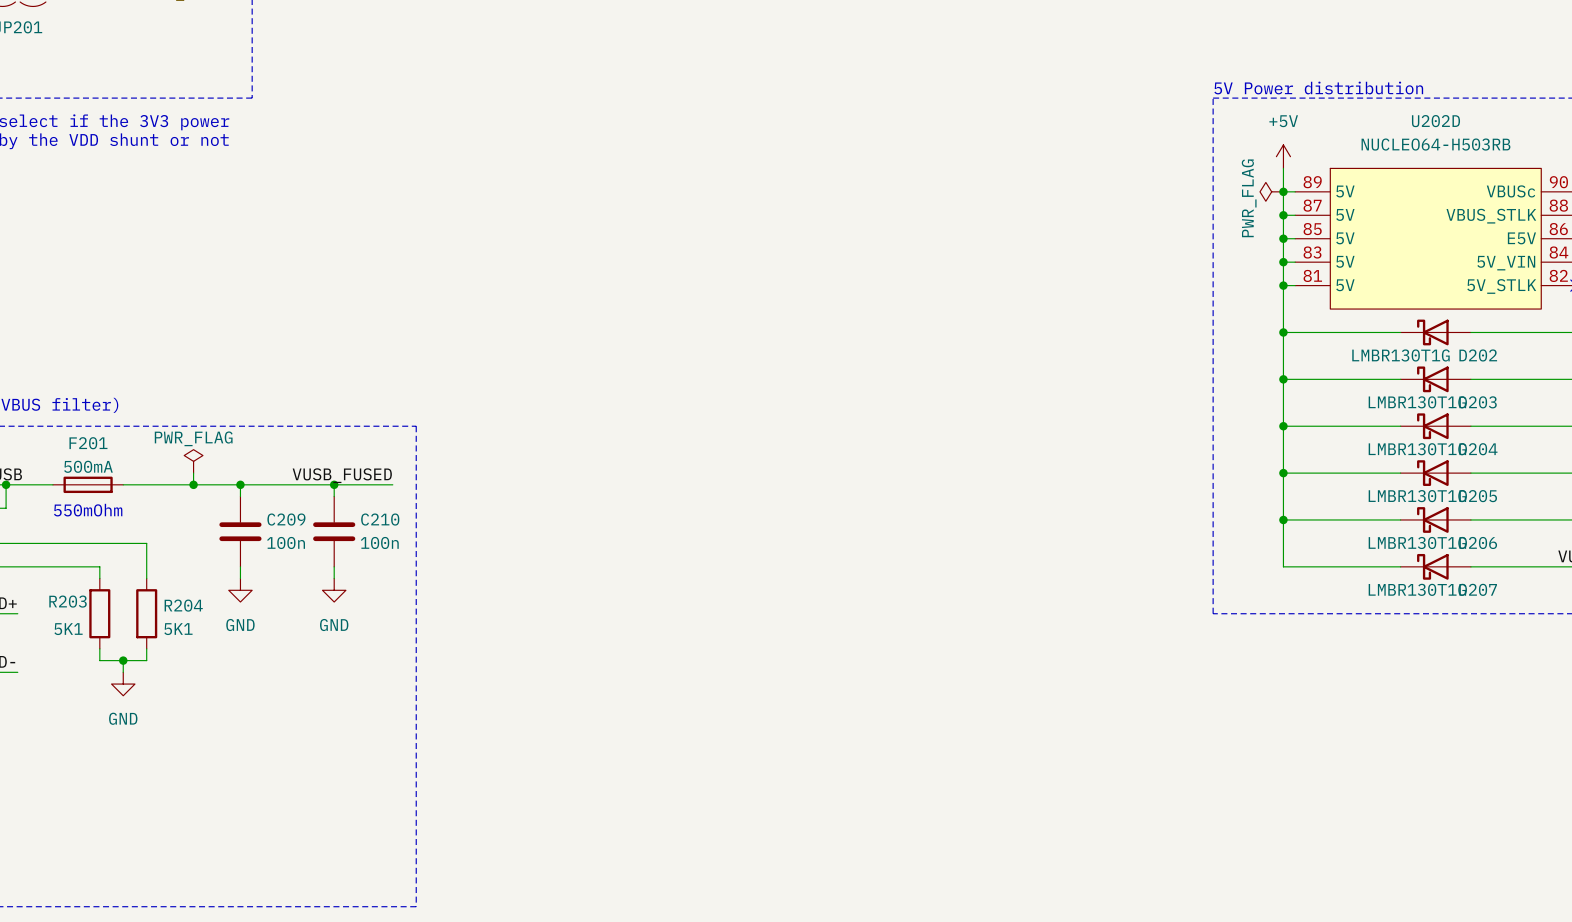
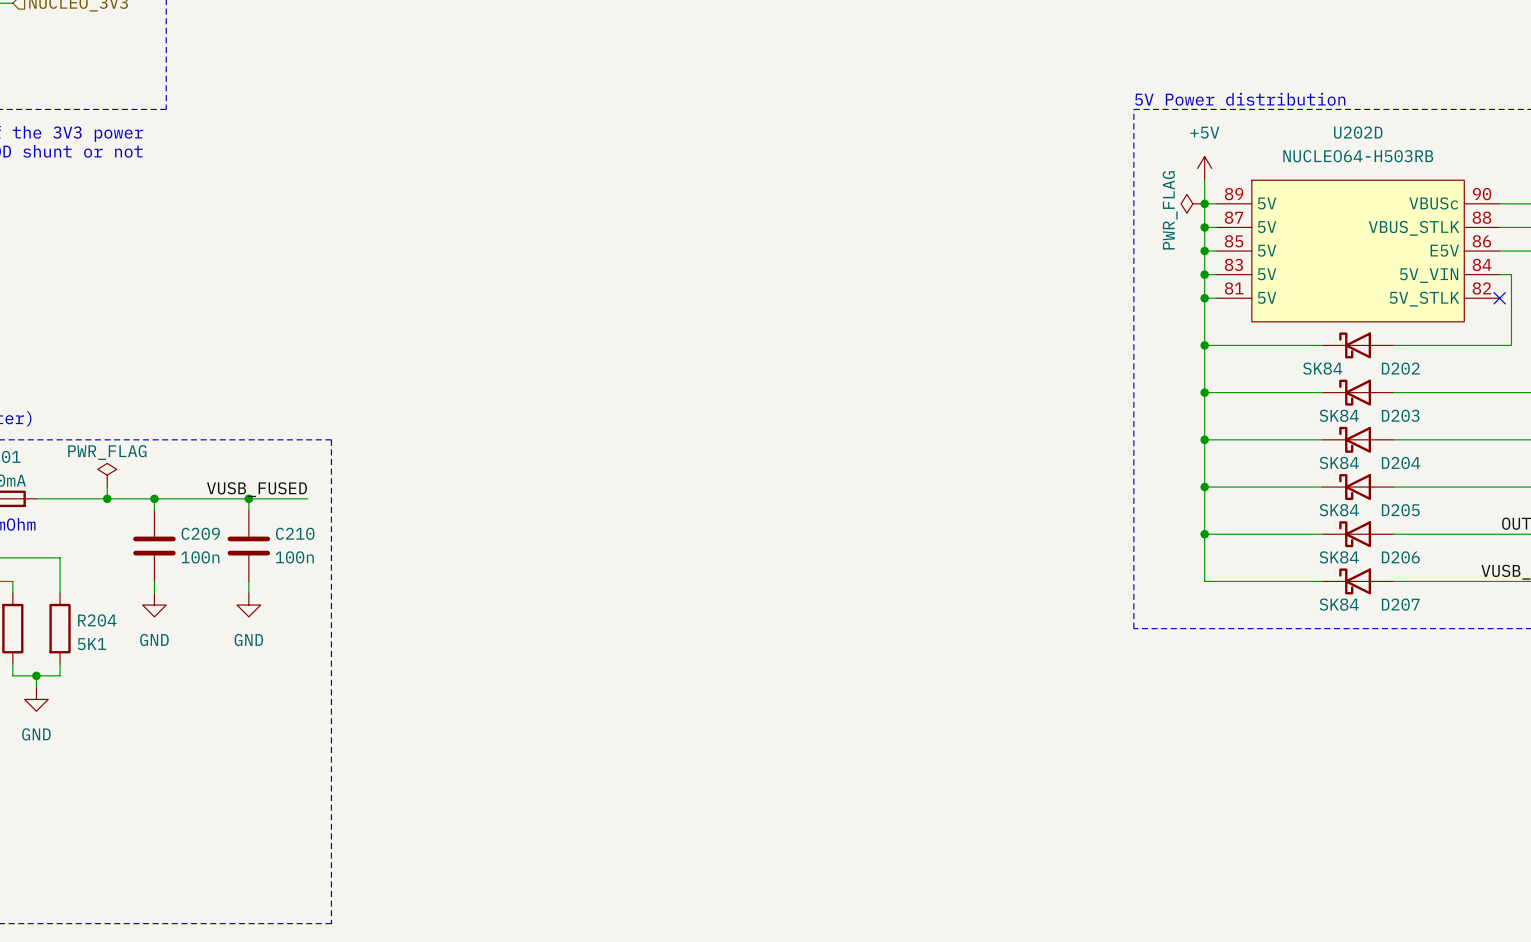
D202 value: LMBR130T1G (1400, 355) -> SK84 (1322, 368)
D203 value: LMBR130T1G (1417, 402) -> SK84 (1339, 415)
D204 value: LMBR130T1G (1417, 449) -> SK84 (1339, 462)
D205 value: LMBR130T1G (1417, 496) -> SK84 (1339, 510)
D206 value: LMBR130T1G (1417, 542) -> SK84 (1339, 557)
D207 value: LMBR130T1G (1417, 589) -> SK84 (1339, 604)

